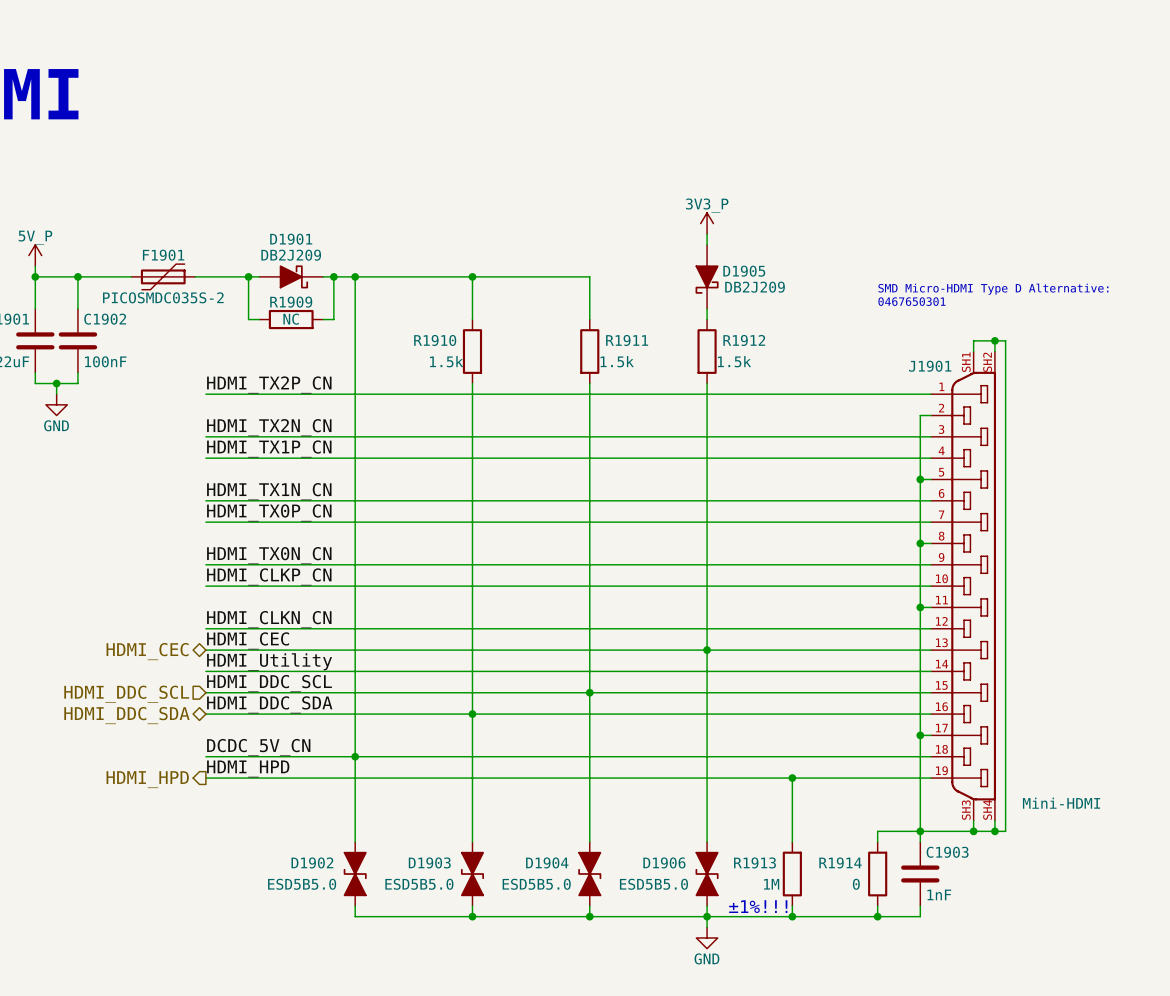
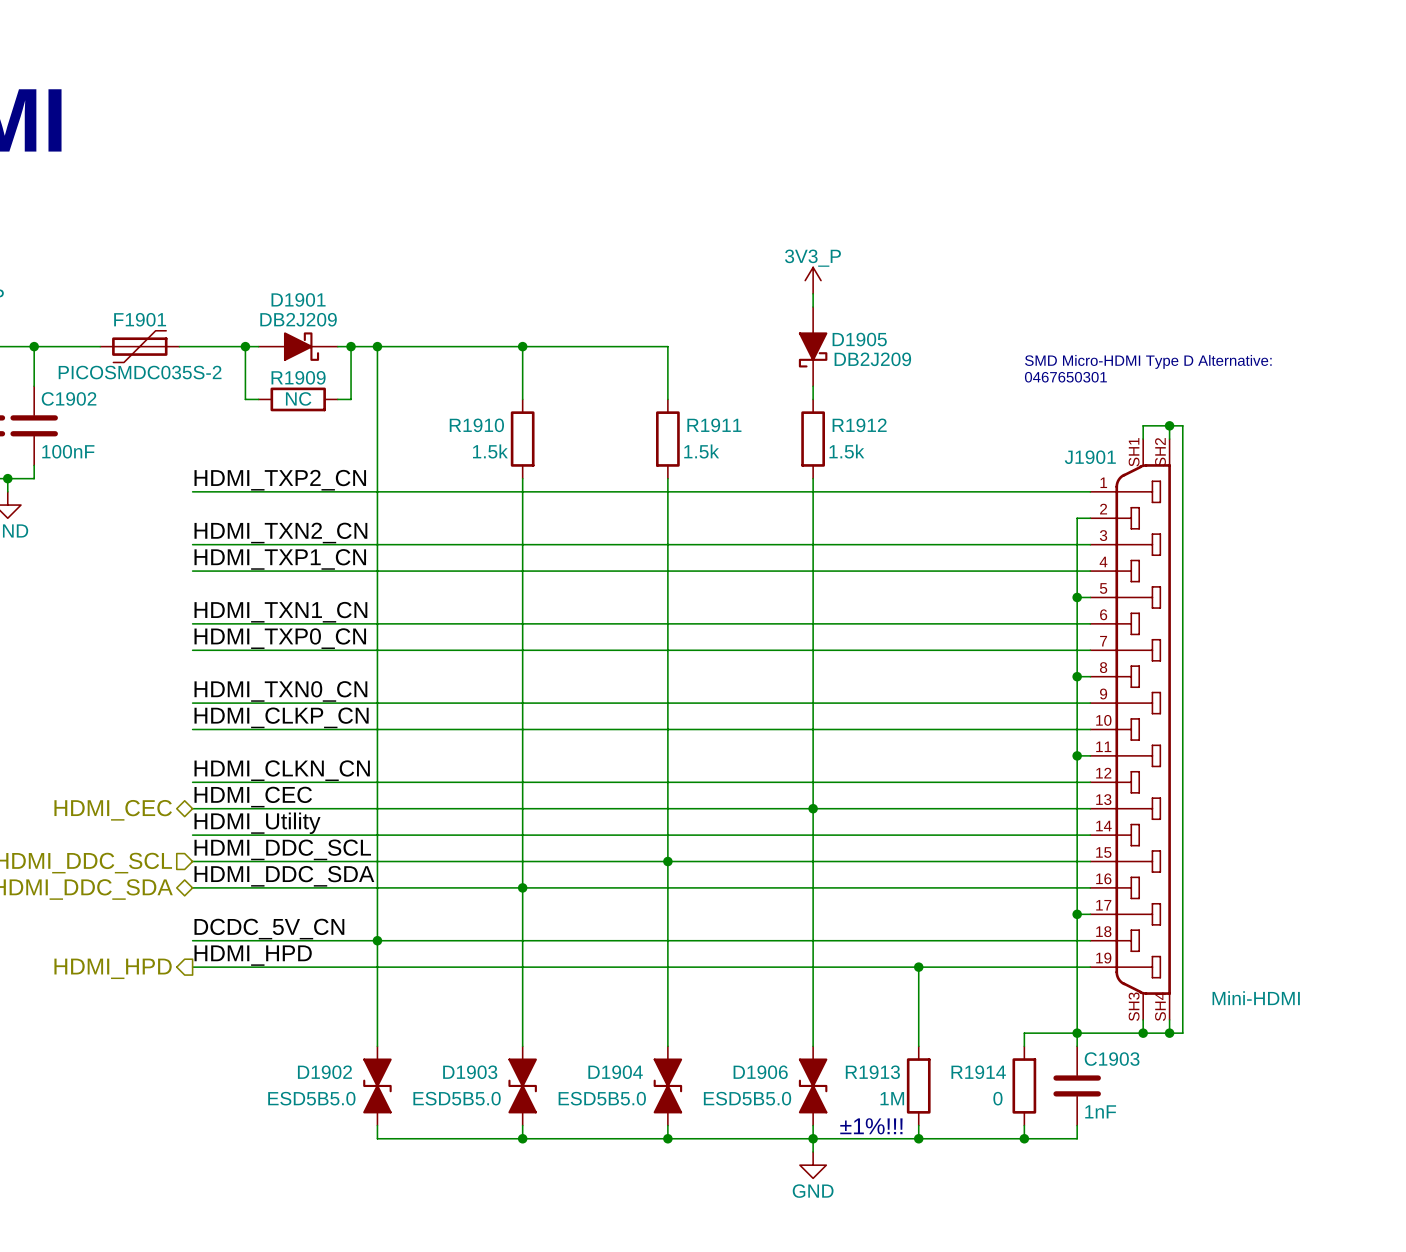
label: HDMI_TX2P_CN (269, 384) -> HDMI_TXP2_CN (280, 480)
label: HDMI_TX2N_CN (269, 427) -> HDMI_TXN2_CN (280, 533)
label: HDMI_TX1P_CN (269, 448) -> HDMI_TXP1_CN (280, 559)
label: HDMI_TX1N_CN (269, 491) -> HDMI_TXN1_CN (280, 612)
label: HDMI_TX0P_CN (269, 512) -> HDMI_TXP0_CN (280, 638)
label: HDMI_TX0N_CN (269, 555) -> HDMI_TXN0_CN (280, 691)

